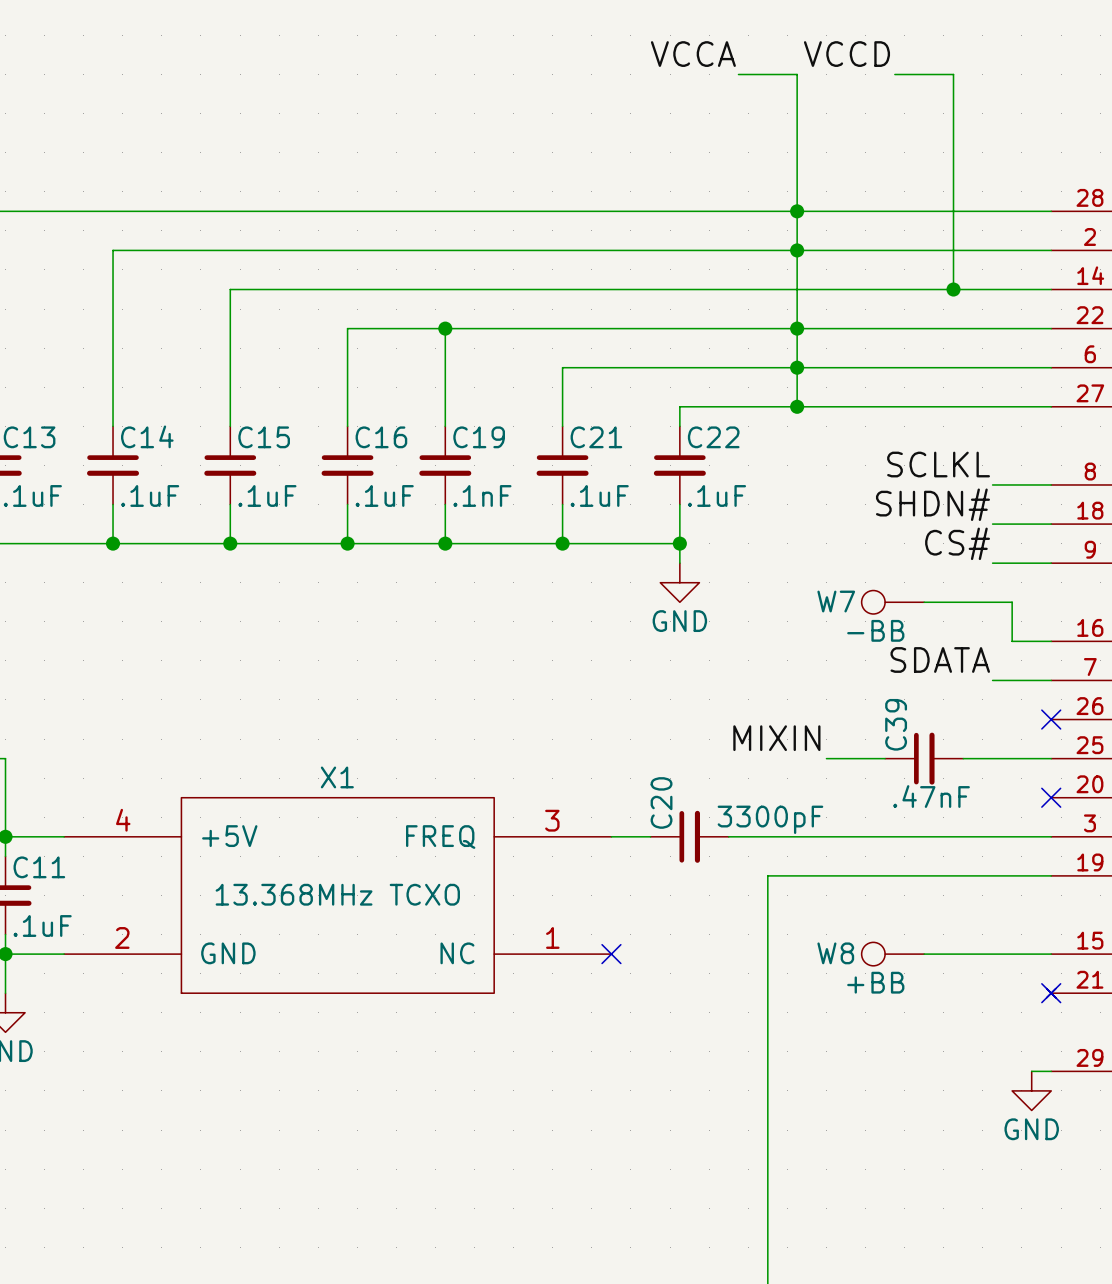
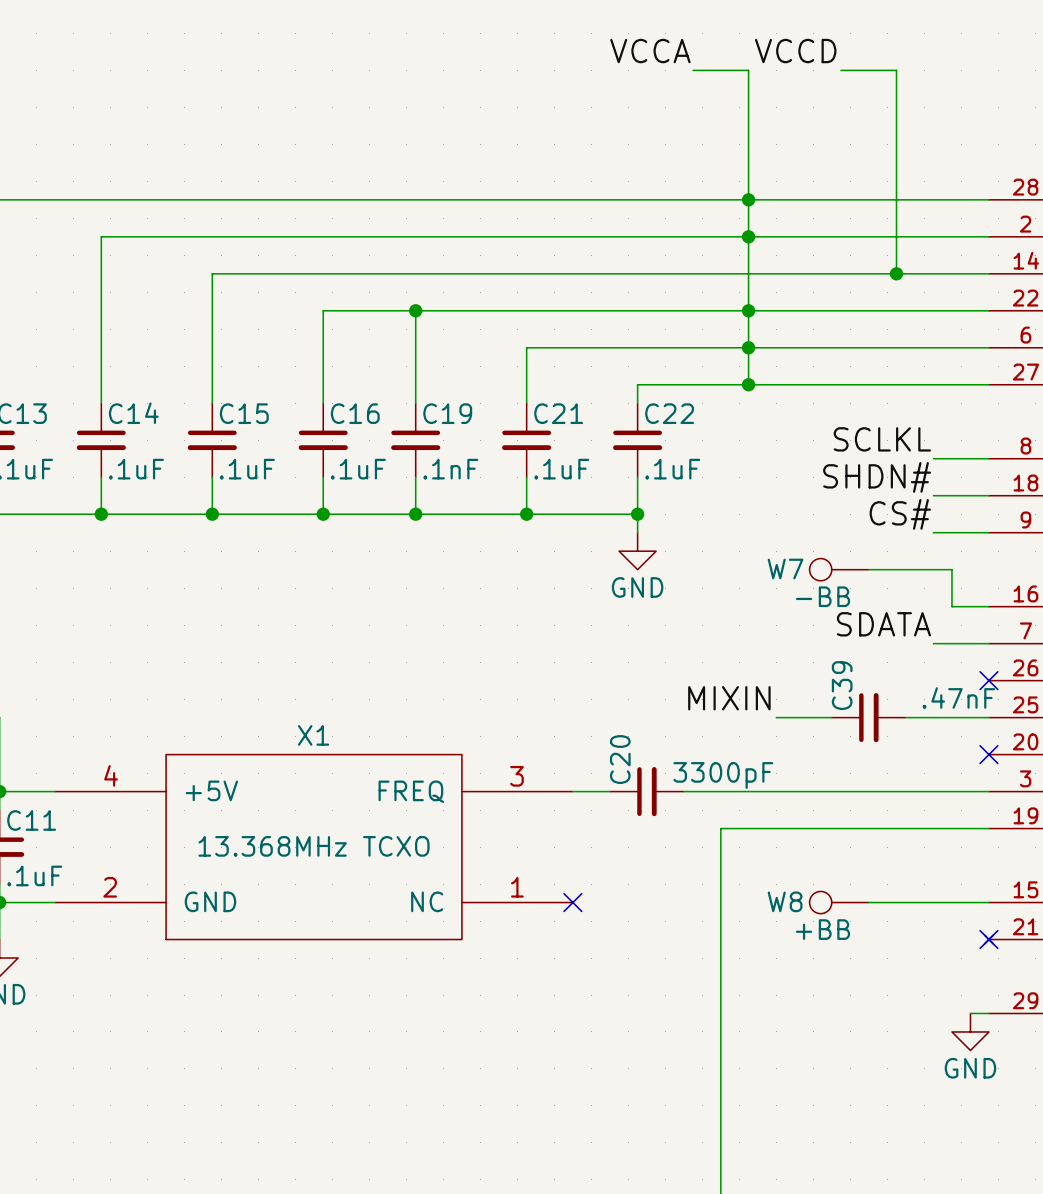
C39 value position: .47nF (931, 796) -> .47nF (958, 697)

